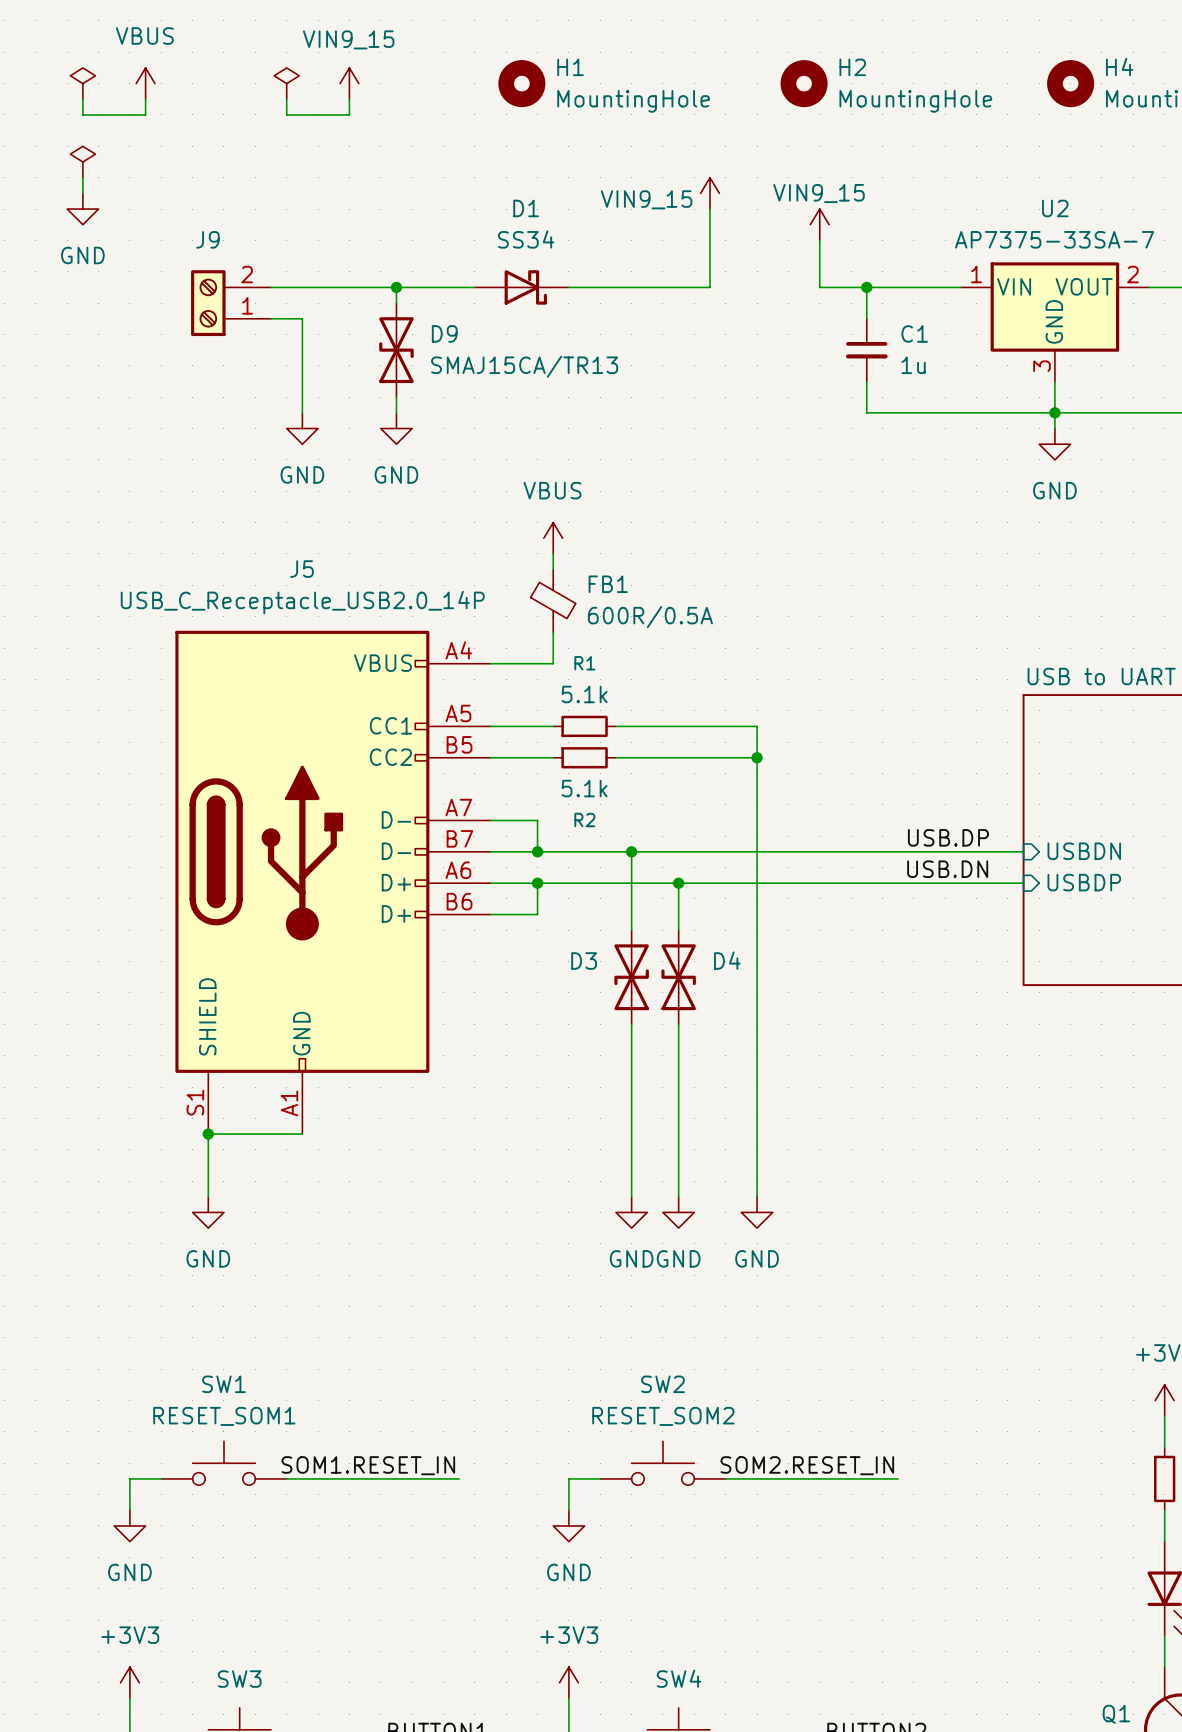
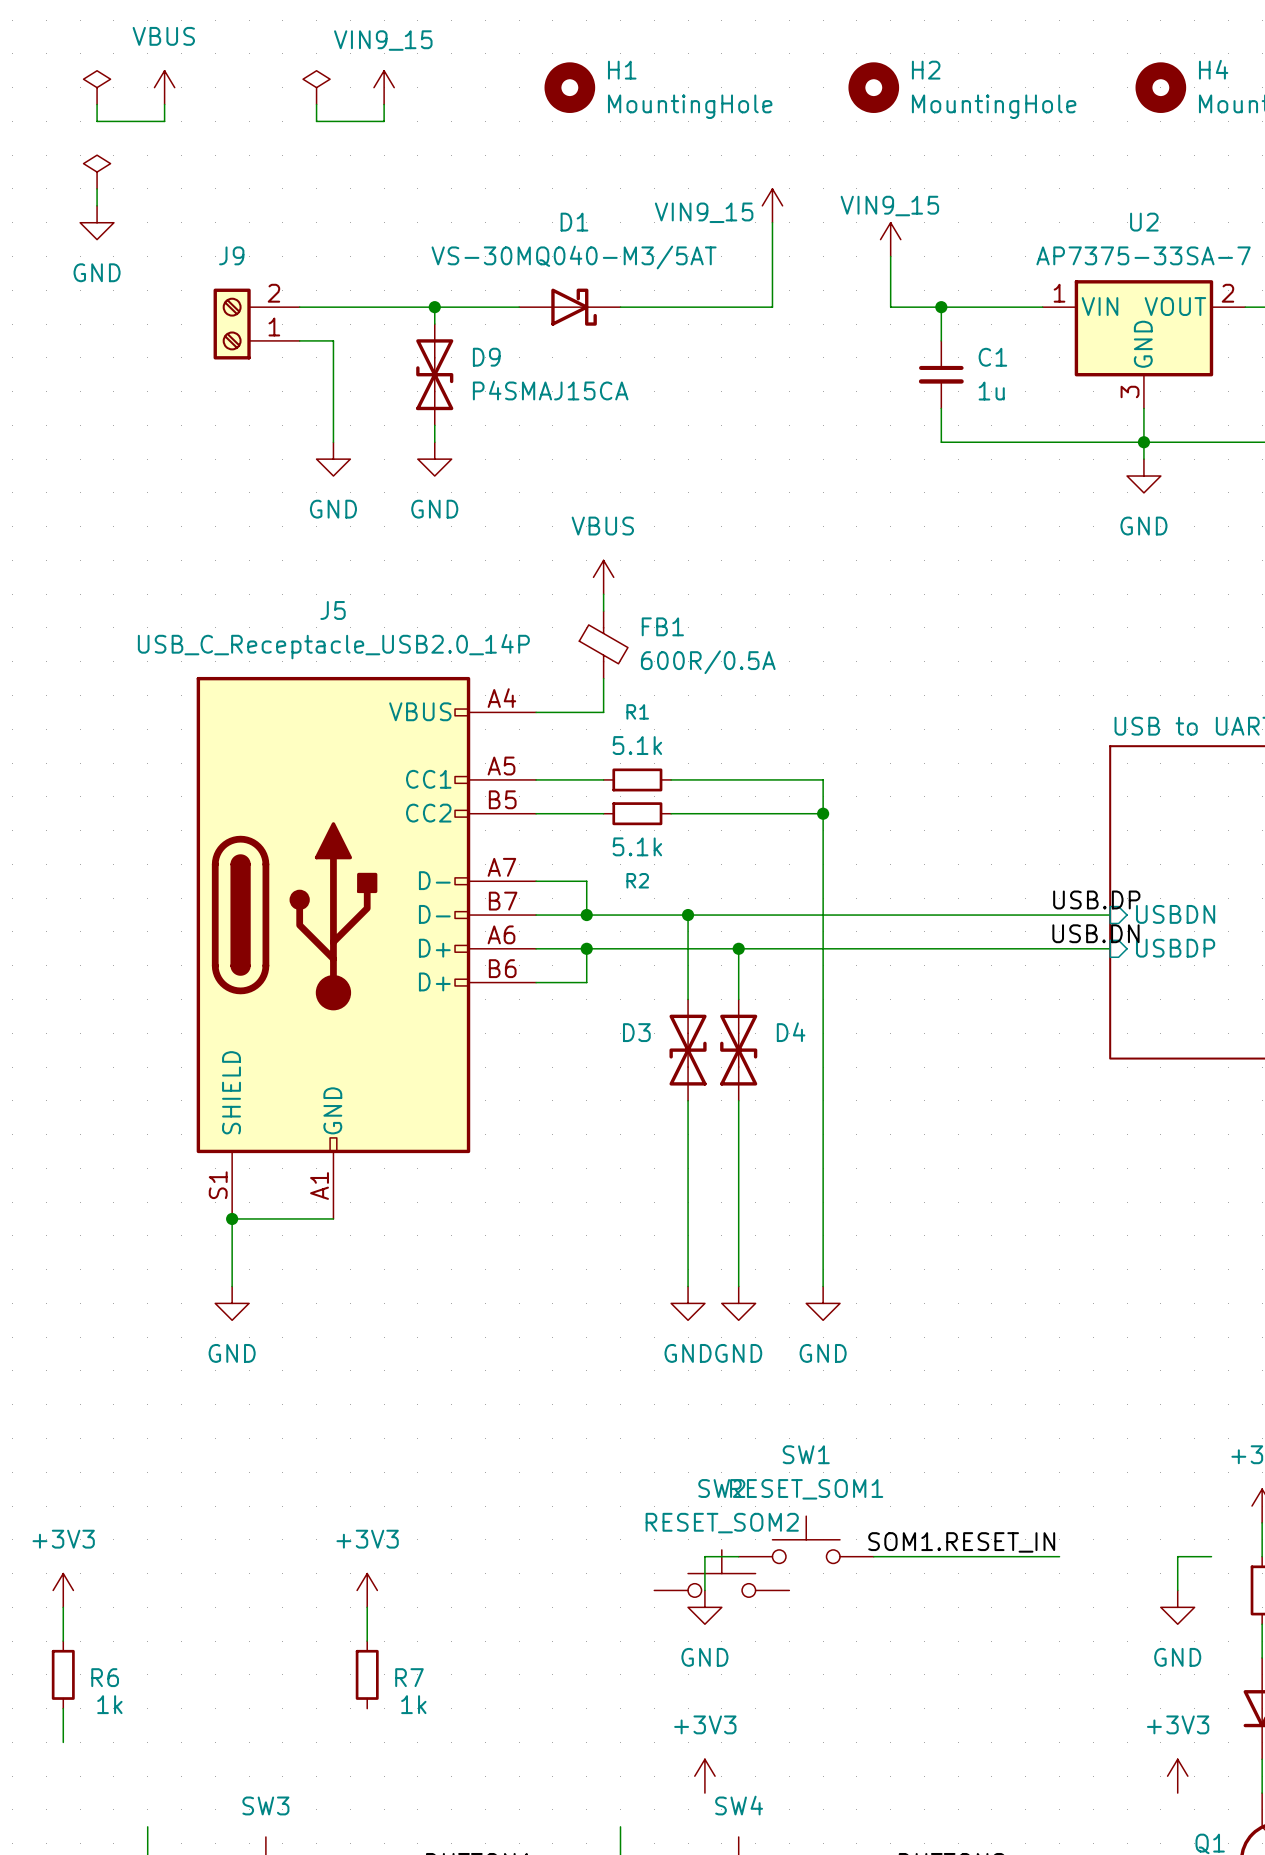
D1 value: SS34 (526, 239) -> VS-30MQ040-M3/5AT (574, 257)
D9 value: SMAJ15CA/TR13 (524, 366) -> P4SMAJ15CA (550, 390)
label position: USB.DP (948, 837) -> USB.DP (1096, 899)
label position: USB.DN (947, 869) -> USB.DN (1095, 933)
wire: none -> (1211, 1556) (1177, 1556) (1177, 1590)
SW1 position: (223, 1463) -> (806, 1539)
label: SOM1.RESET_IN (368, 1465) -> none
label: SOM2.RESET_IN (807, 1465) -> SOM1.RESET_IN (961, 1542)
power symbol: none -> +3V3 (63, 1590)
wire: (161, 1478) (129, 1478) (129, 1510) -> none
wire: (286, 1478) (459, 1478) -> none
power symbol: none -> +3V3 (367, 1590)
wire: (600, 1478) (568, 1478) (568, 1510) -> (738, 1556) (704, 1556) (704, 1590)
wire: (725, 1478) (898, 1478) -> (873, 1556) (1059, 1556)
wire: none -> (63, 1607) (63, 1641)
wire: none -> (367, 1607) (367, 1641)
power symbol: none -> GND (1177, 1607)
power symbol: GND (129, 1525) -> none
power symbol position: GND (568, 1525) -> GND (704, 1607)
R6: none -> 1k (63, 1674)
R7: none -> 1k (367, 1674)
wire: none -> (63, 1708) (63, 1742)
power symbol: none -> +3V3 (1177, 1776)
power symbol: +3V3 (129, 1682) -> none
power symbol position: +3V3 (568, 1682) -> +3V3 (704, 1776)

